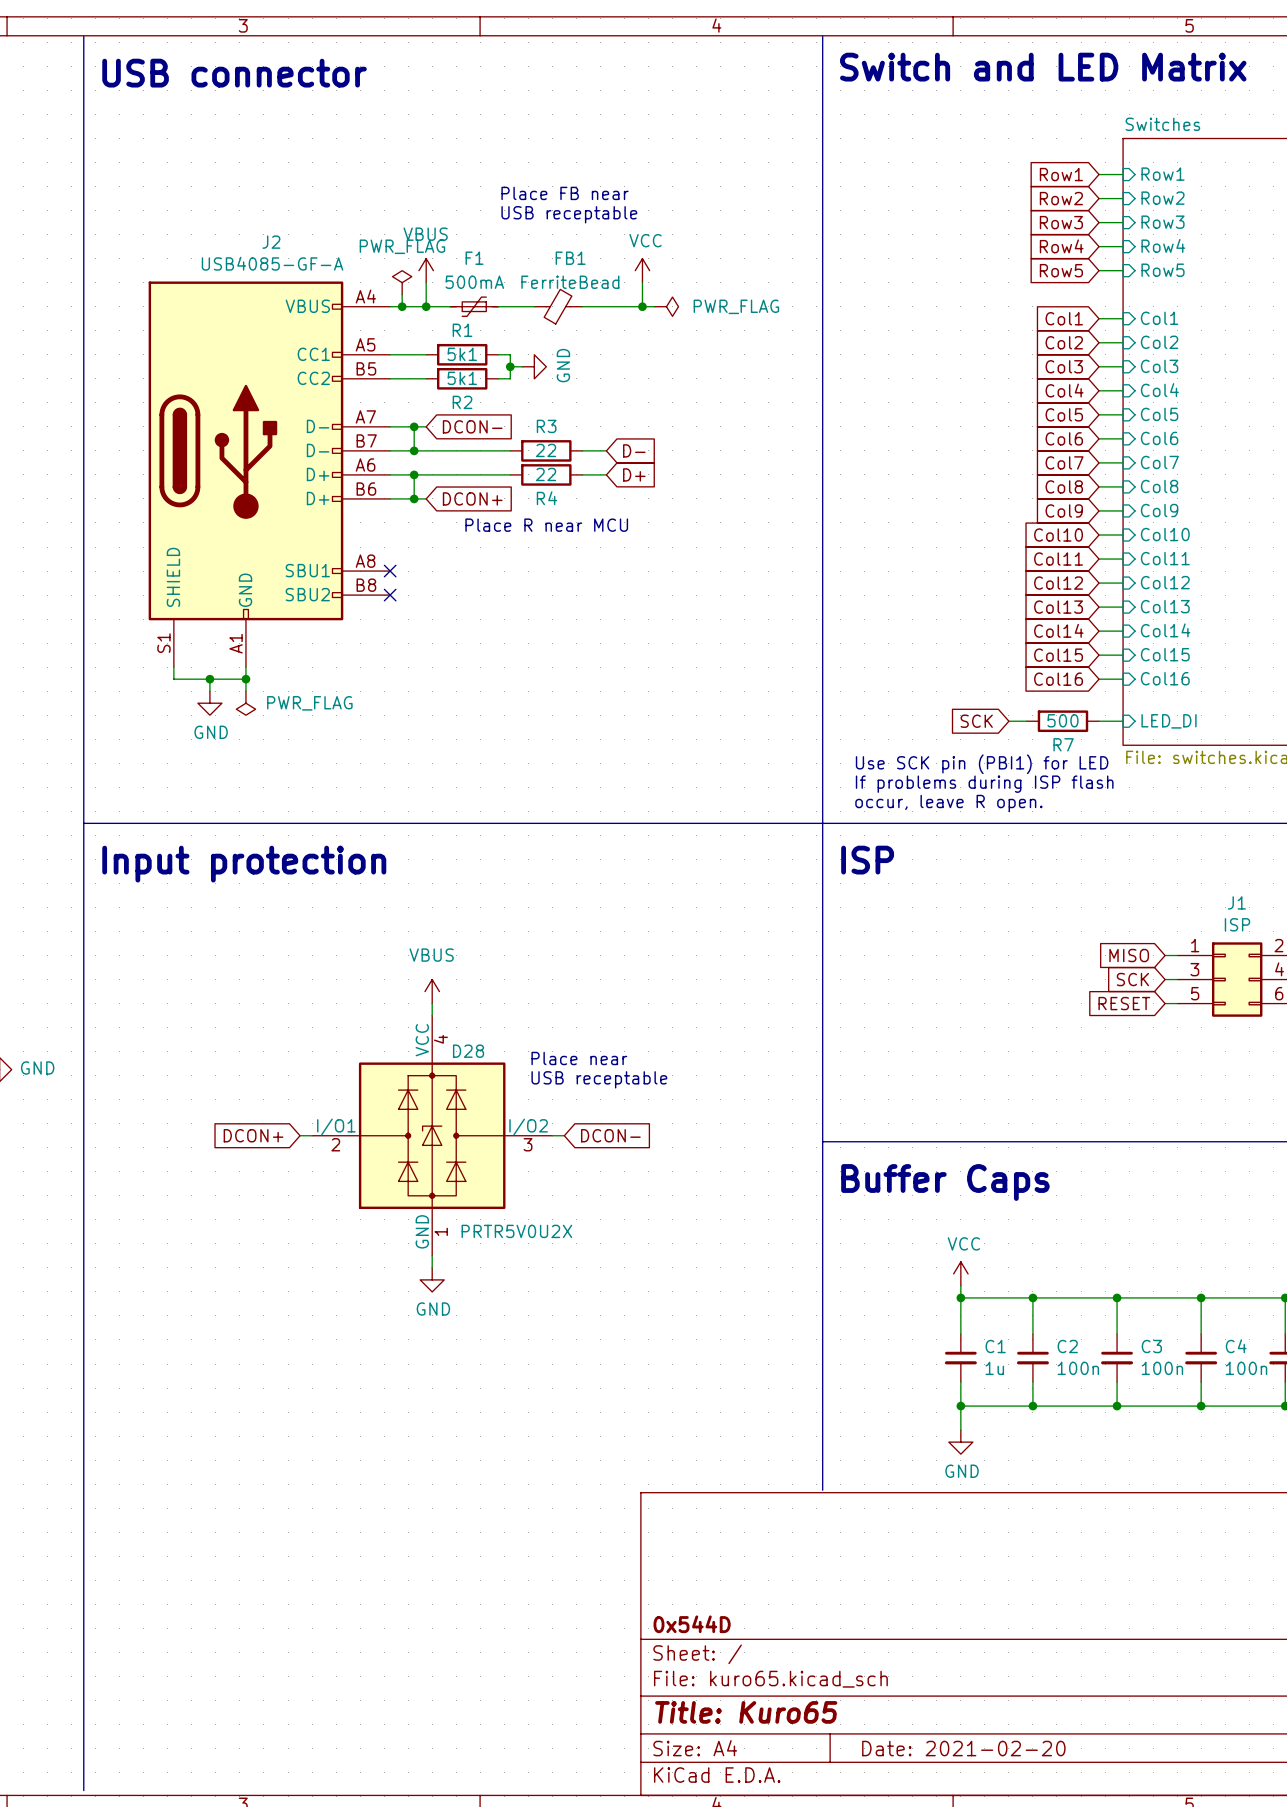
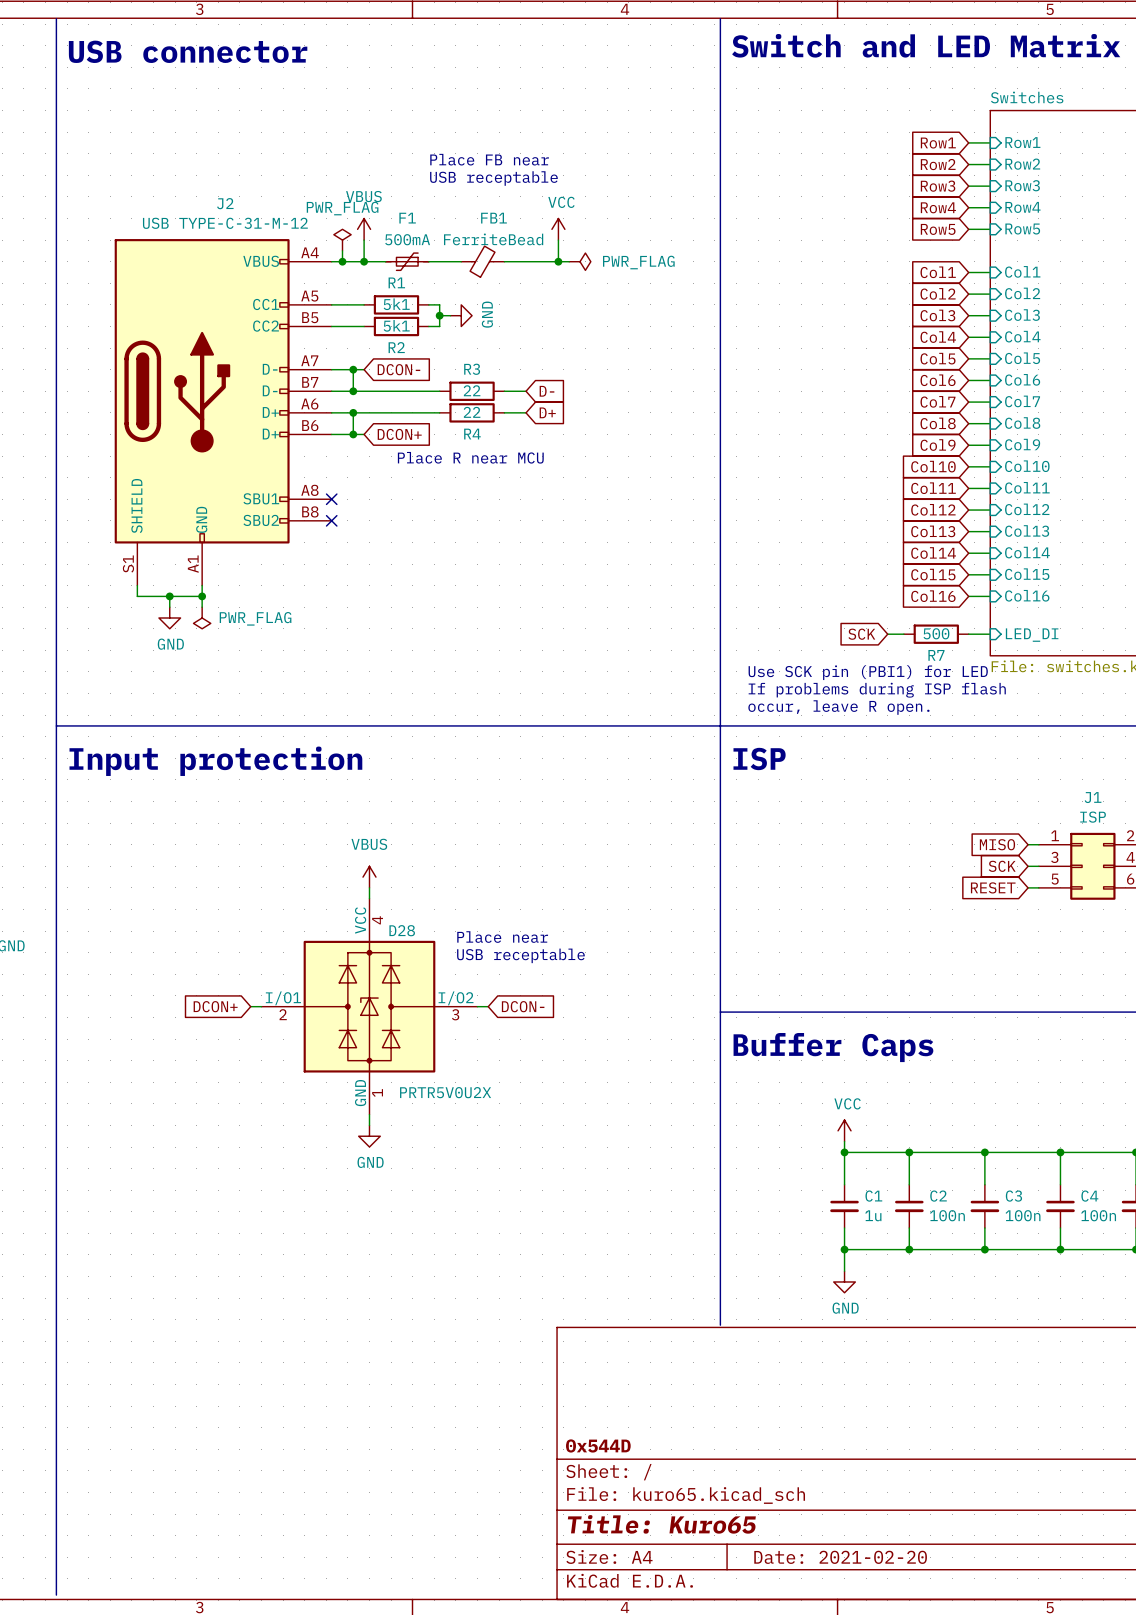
J2 value: USB4085-GF-A (272, 263) -> USB TYPE-C-31-M-12 (225, 223)

